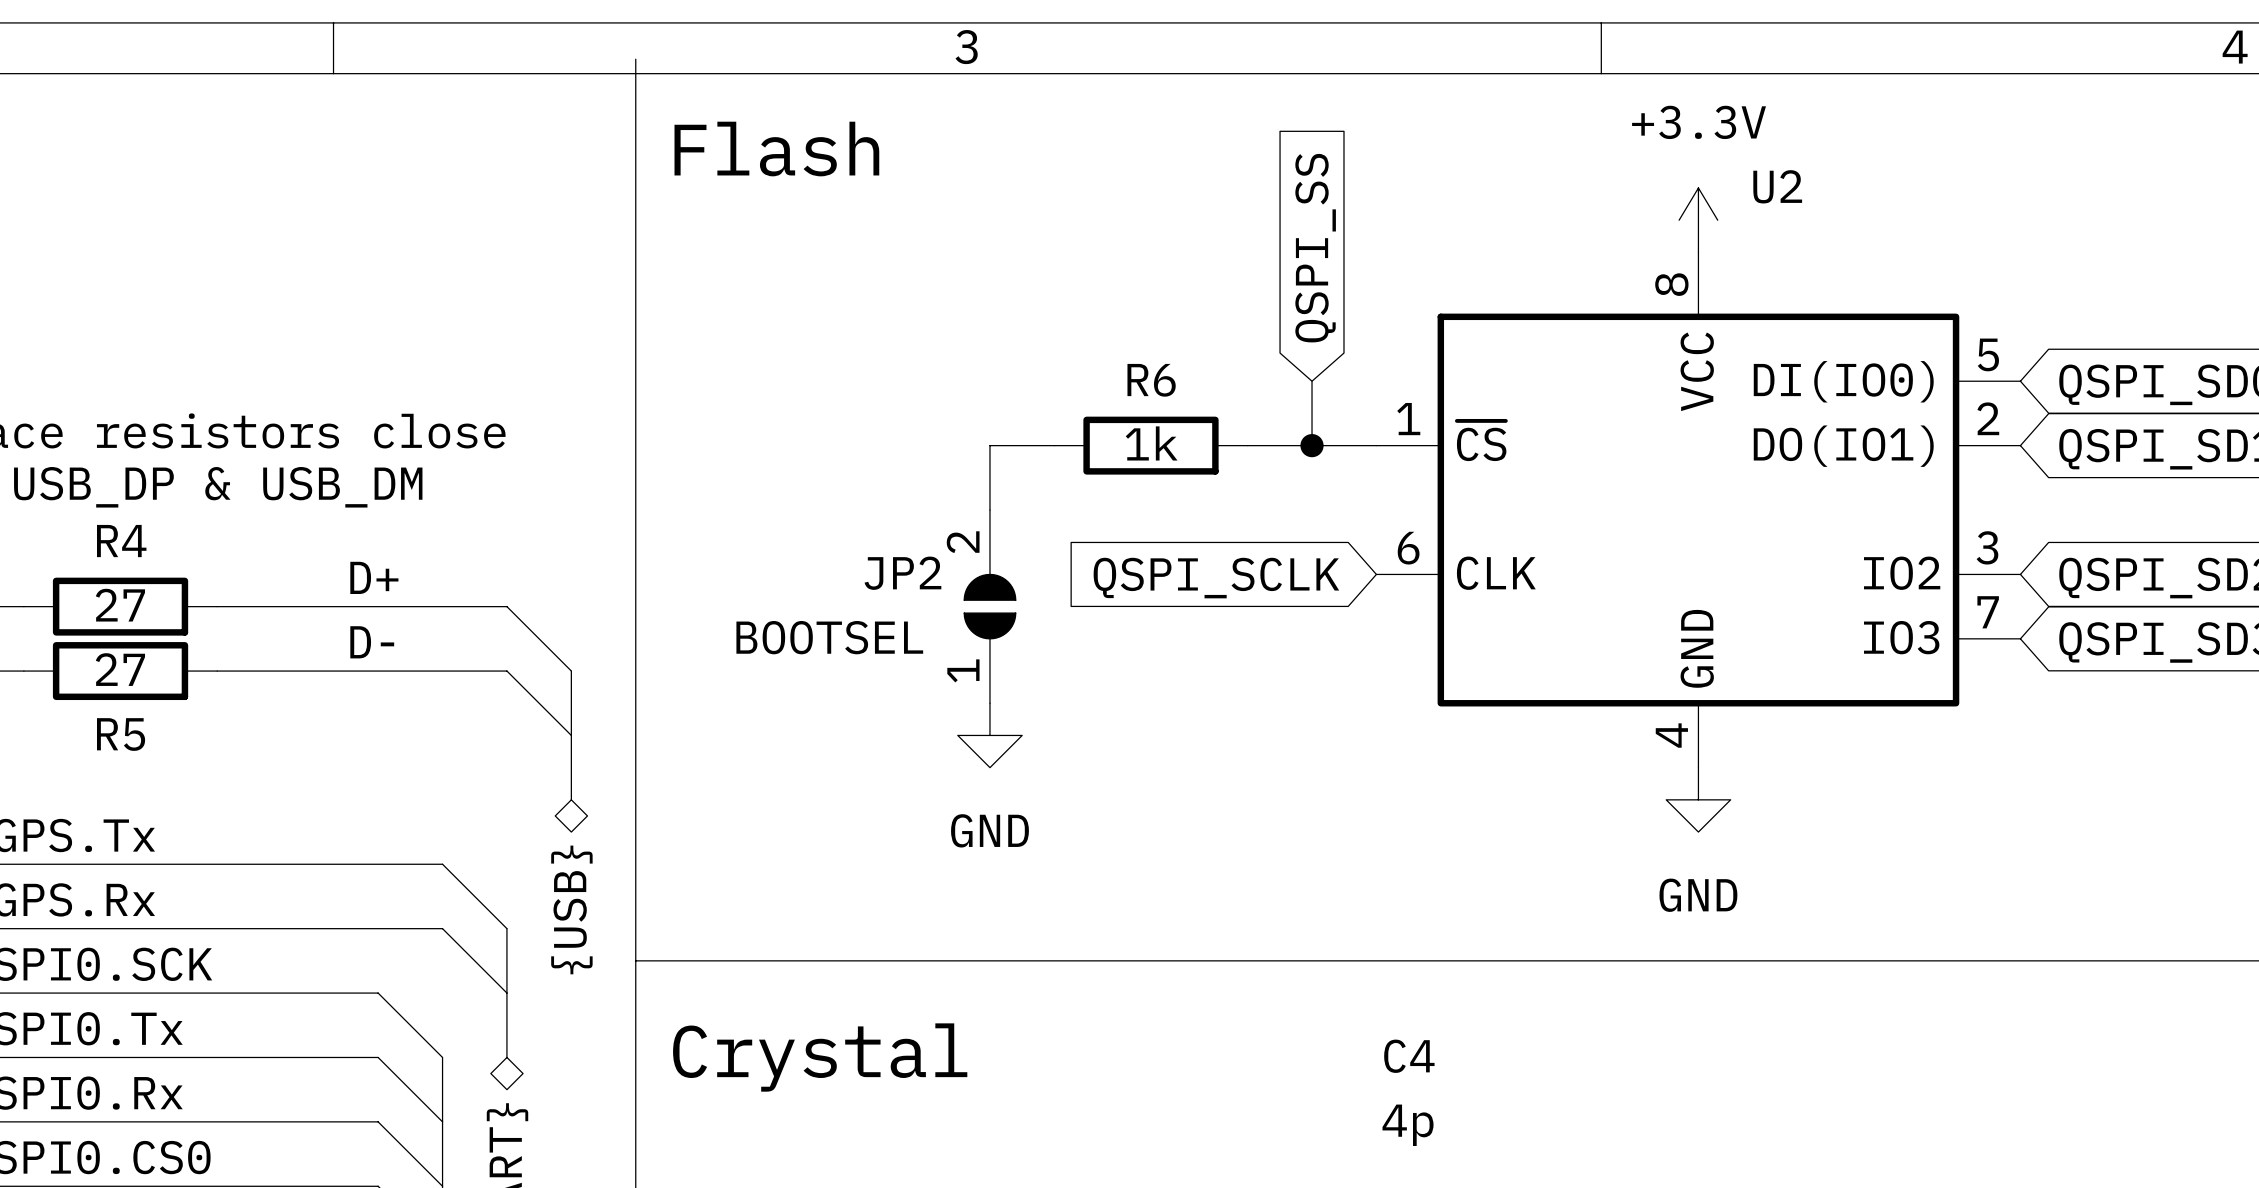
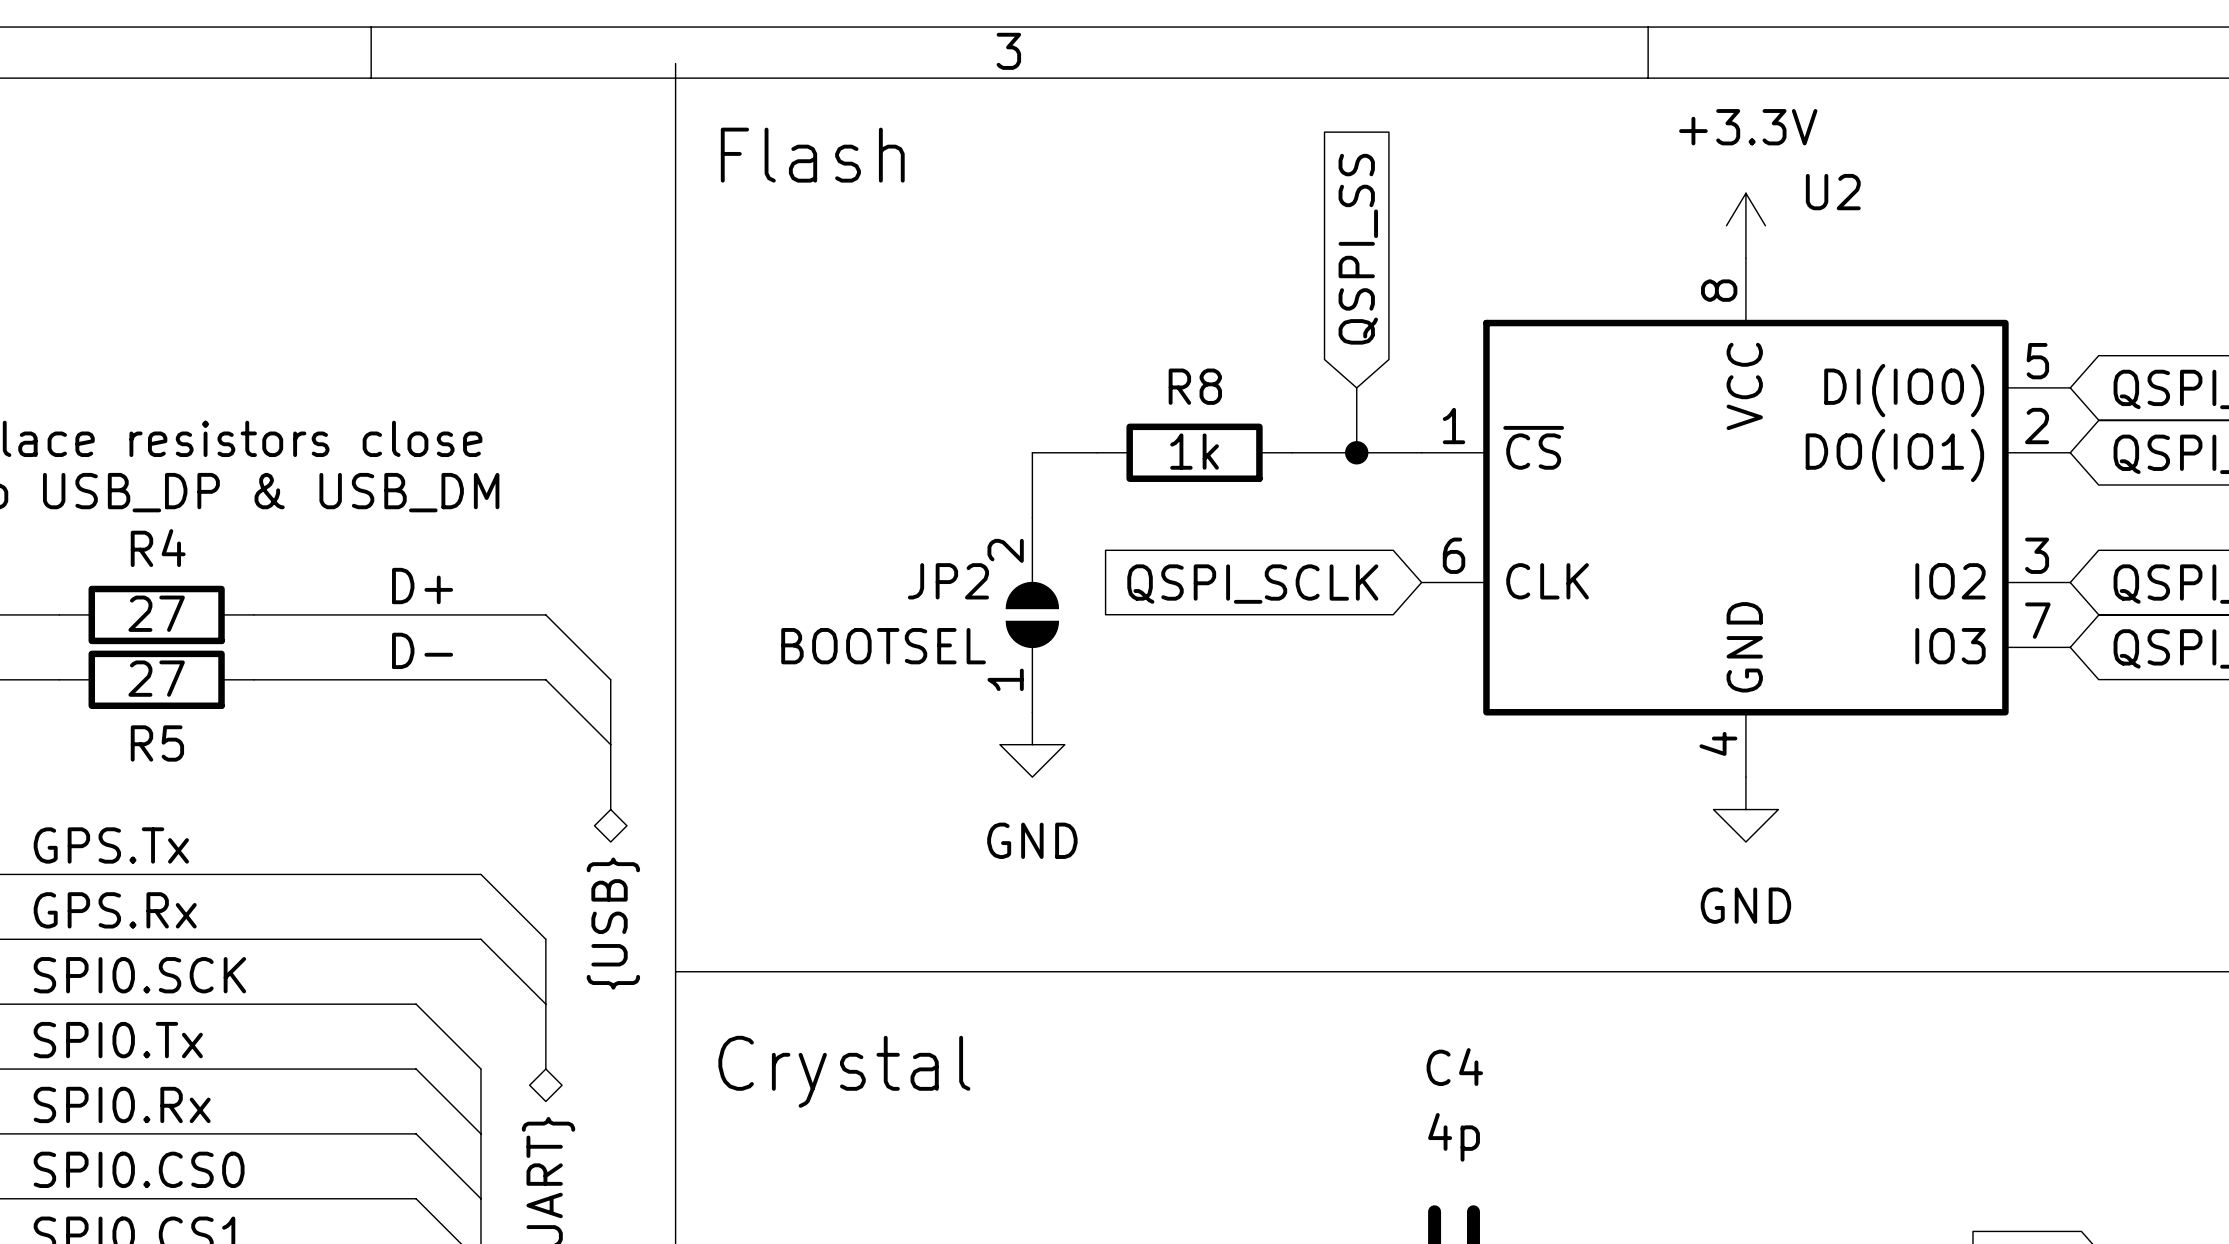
R6 name: R6 (1151, 380) -> R8 (1195, 386)

